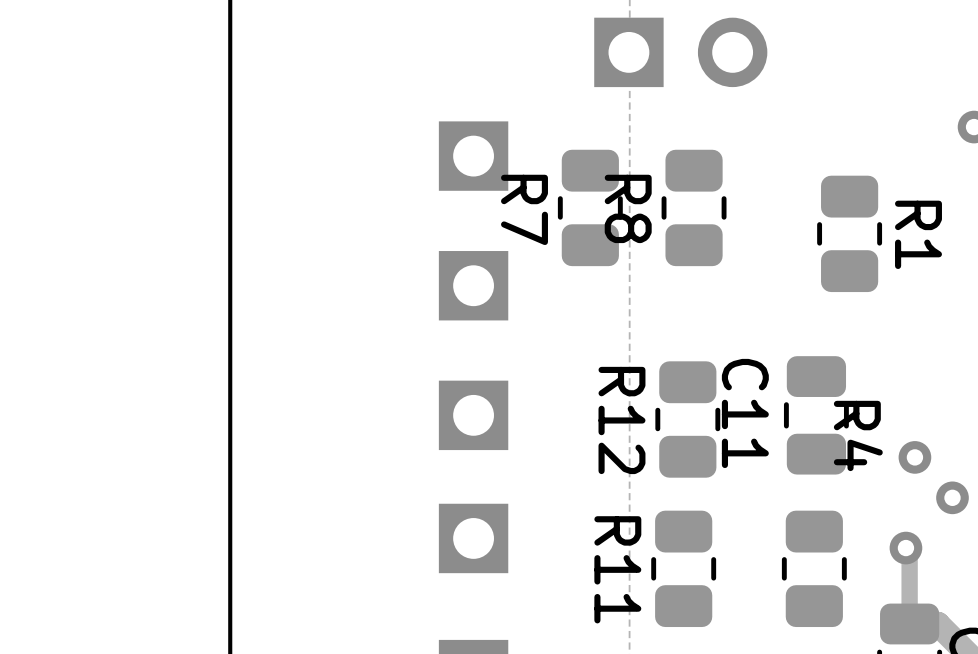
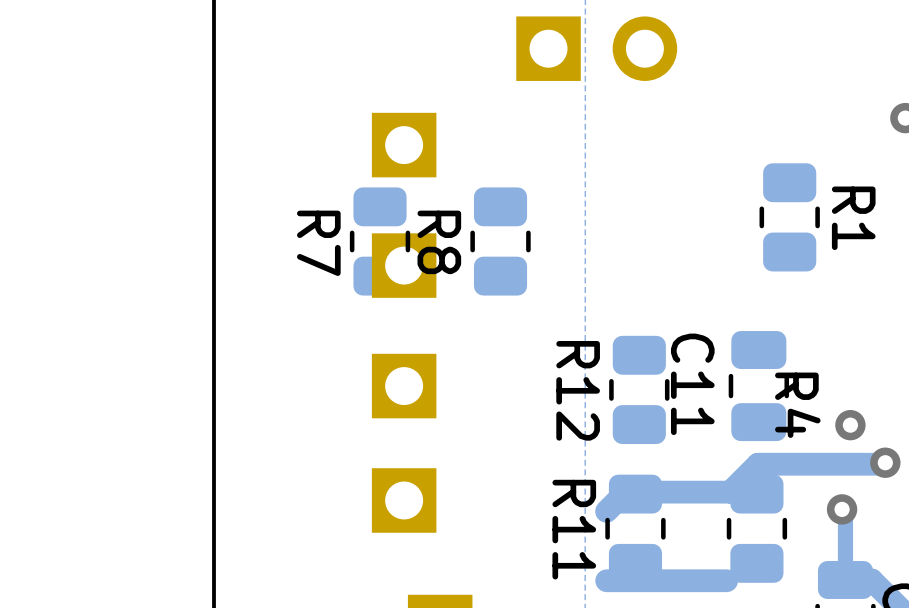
part position: (680, 52) -> (596, 48)
part position: (473, 156) -> (404, 145)
R7 position: (590, 207) -> (380, 241)
R8 position: (694, 207) -> (500, 241)
part position: (473, 285) -> (404, 265)
part position: (473, 415) -> (404, 386)
track: none -> (885, 462) (758, 464) (730, 492) (625, 492) (606, 511)
part position: (473, 538) -> (404, 500)
track: none -> (726, 580) (606, 580)

